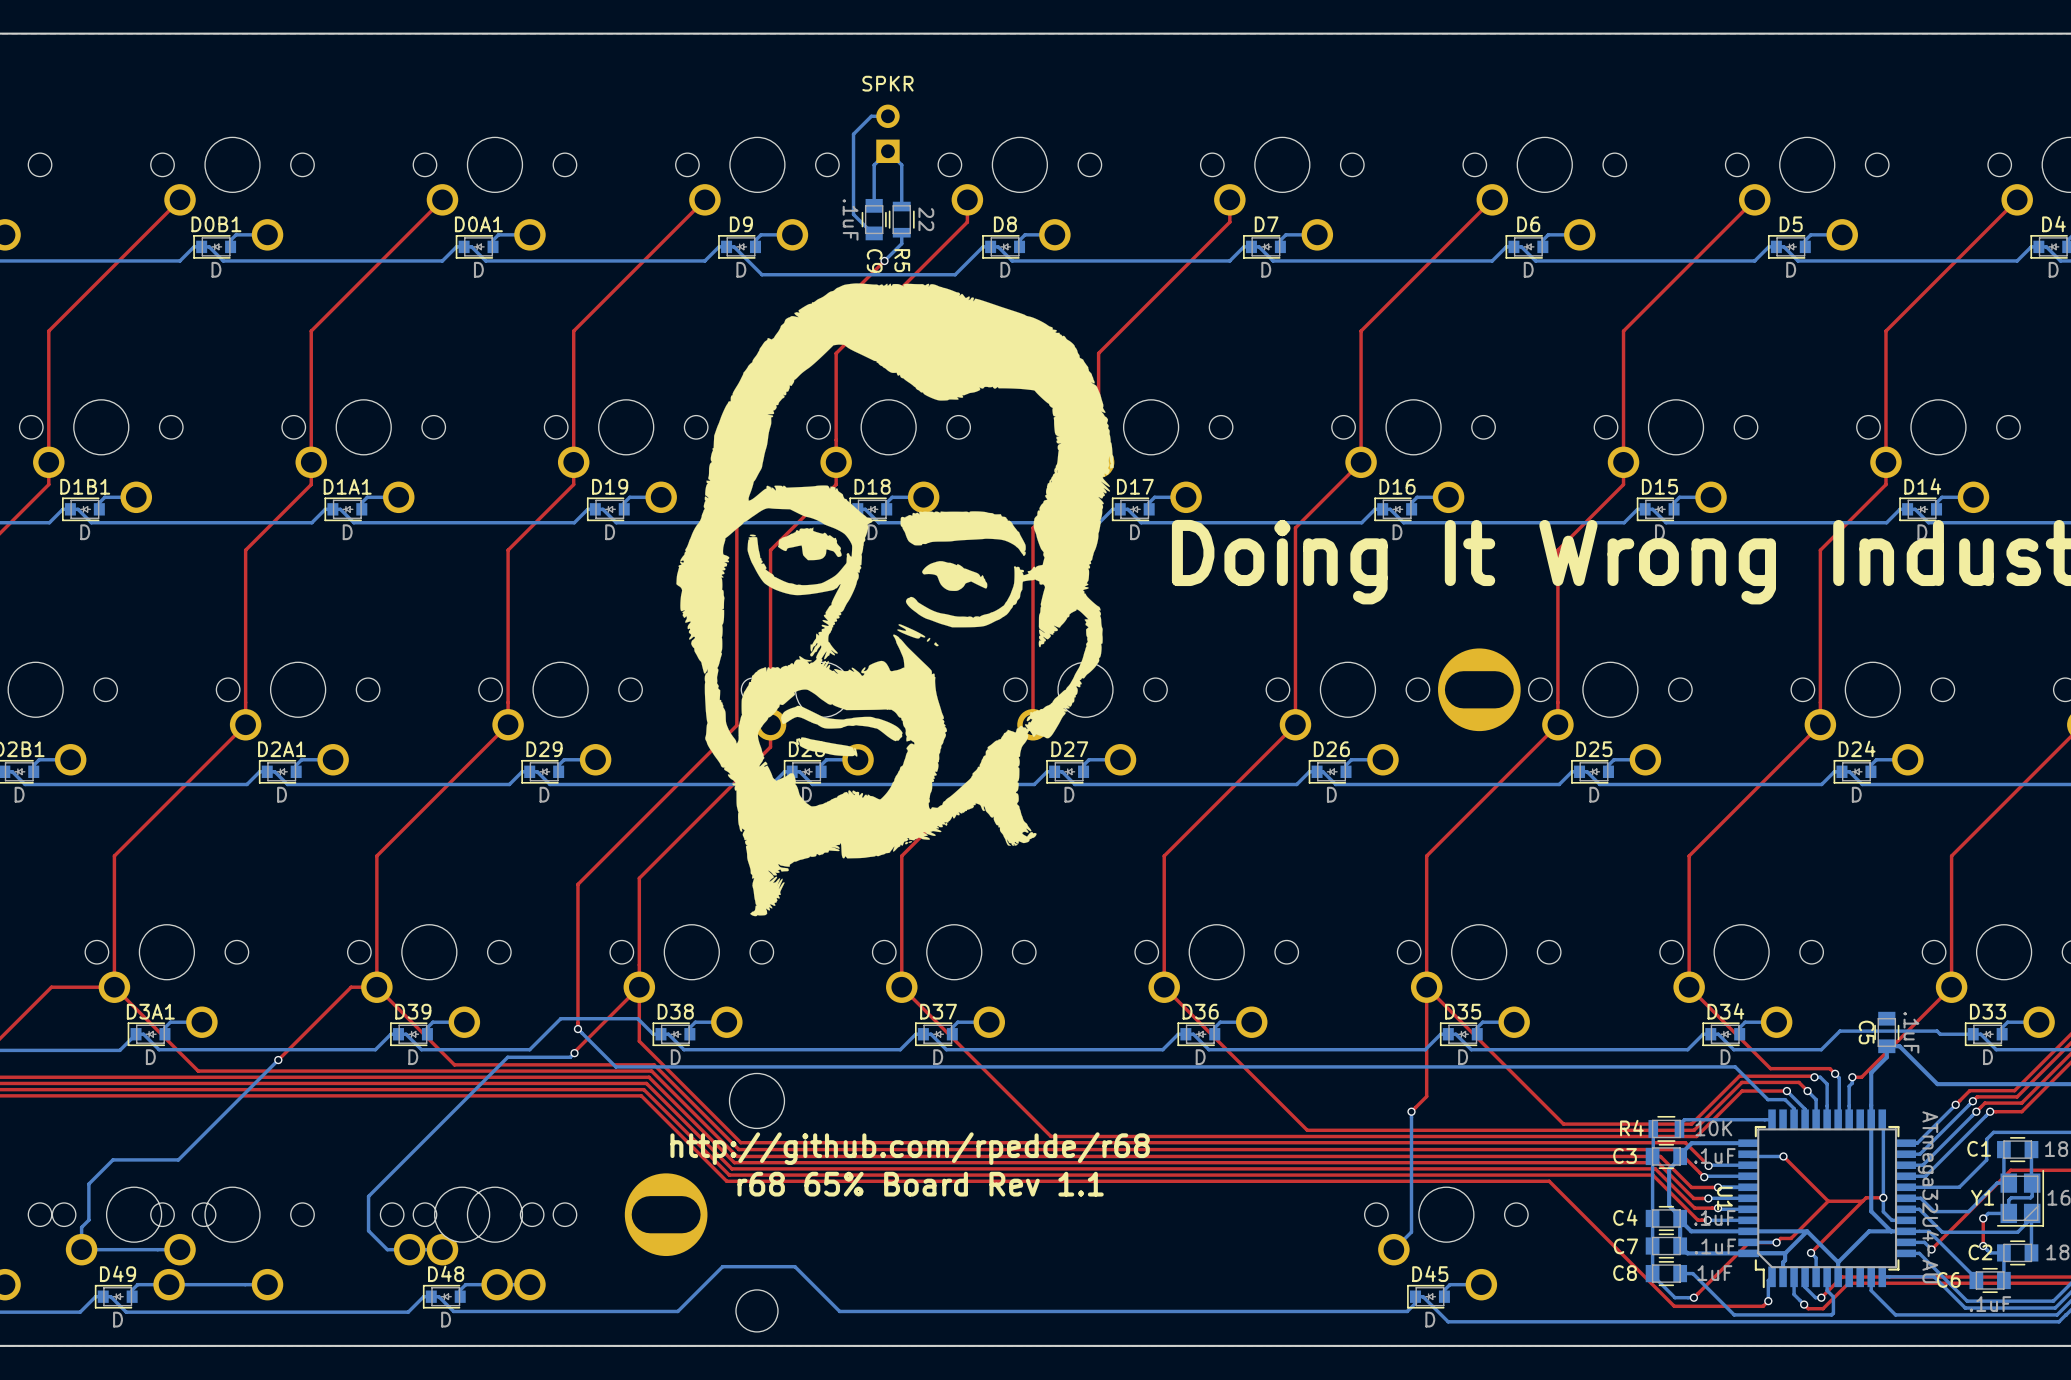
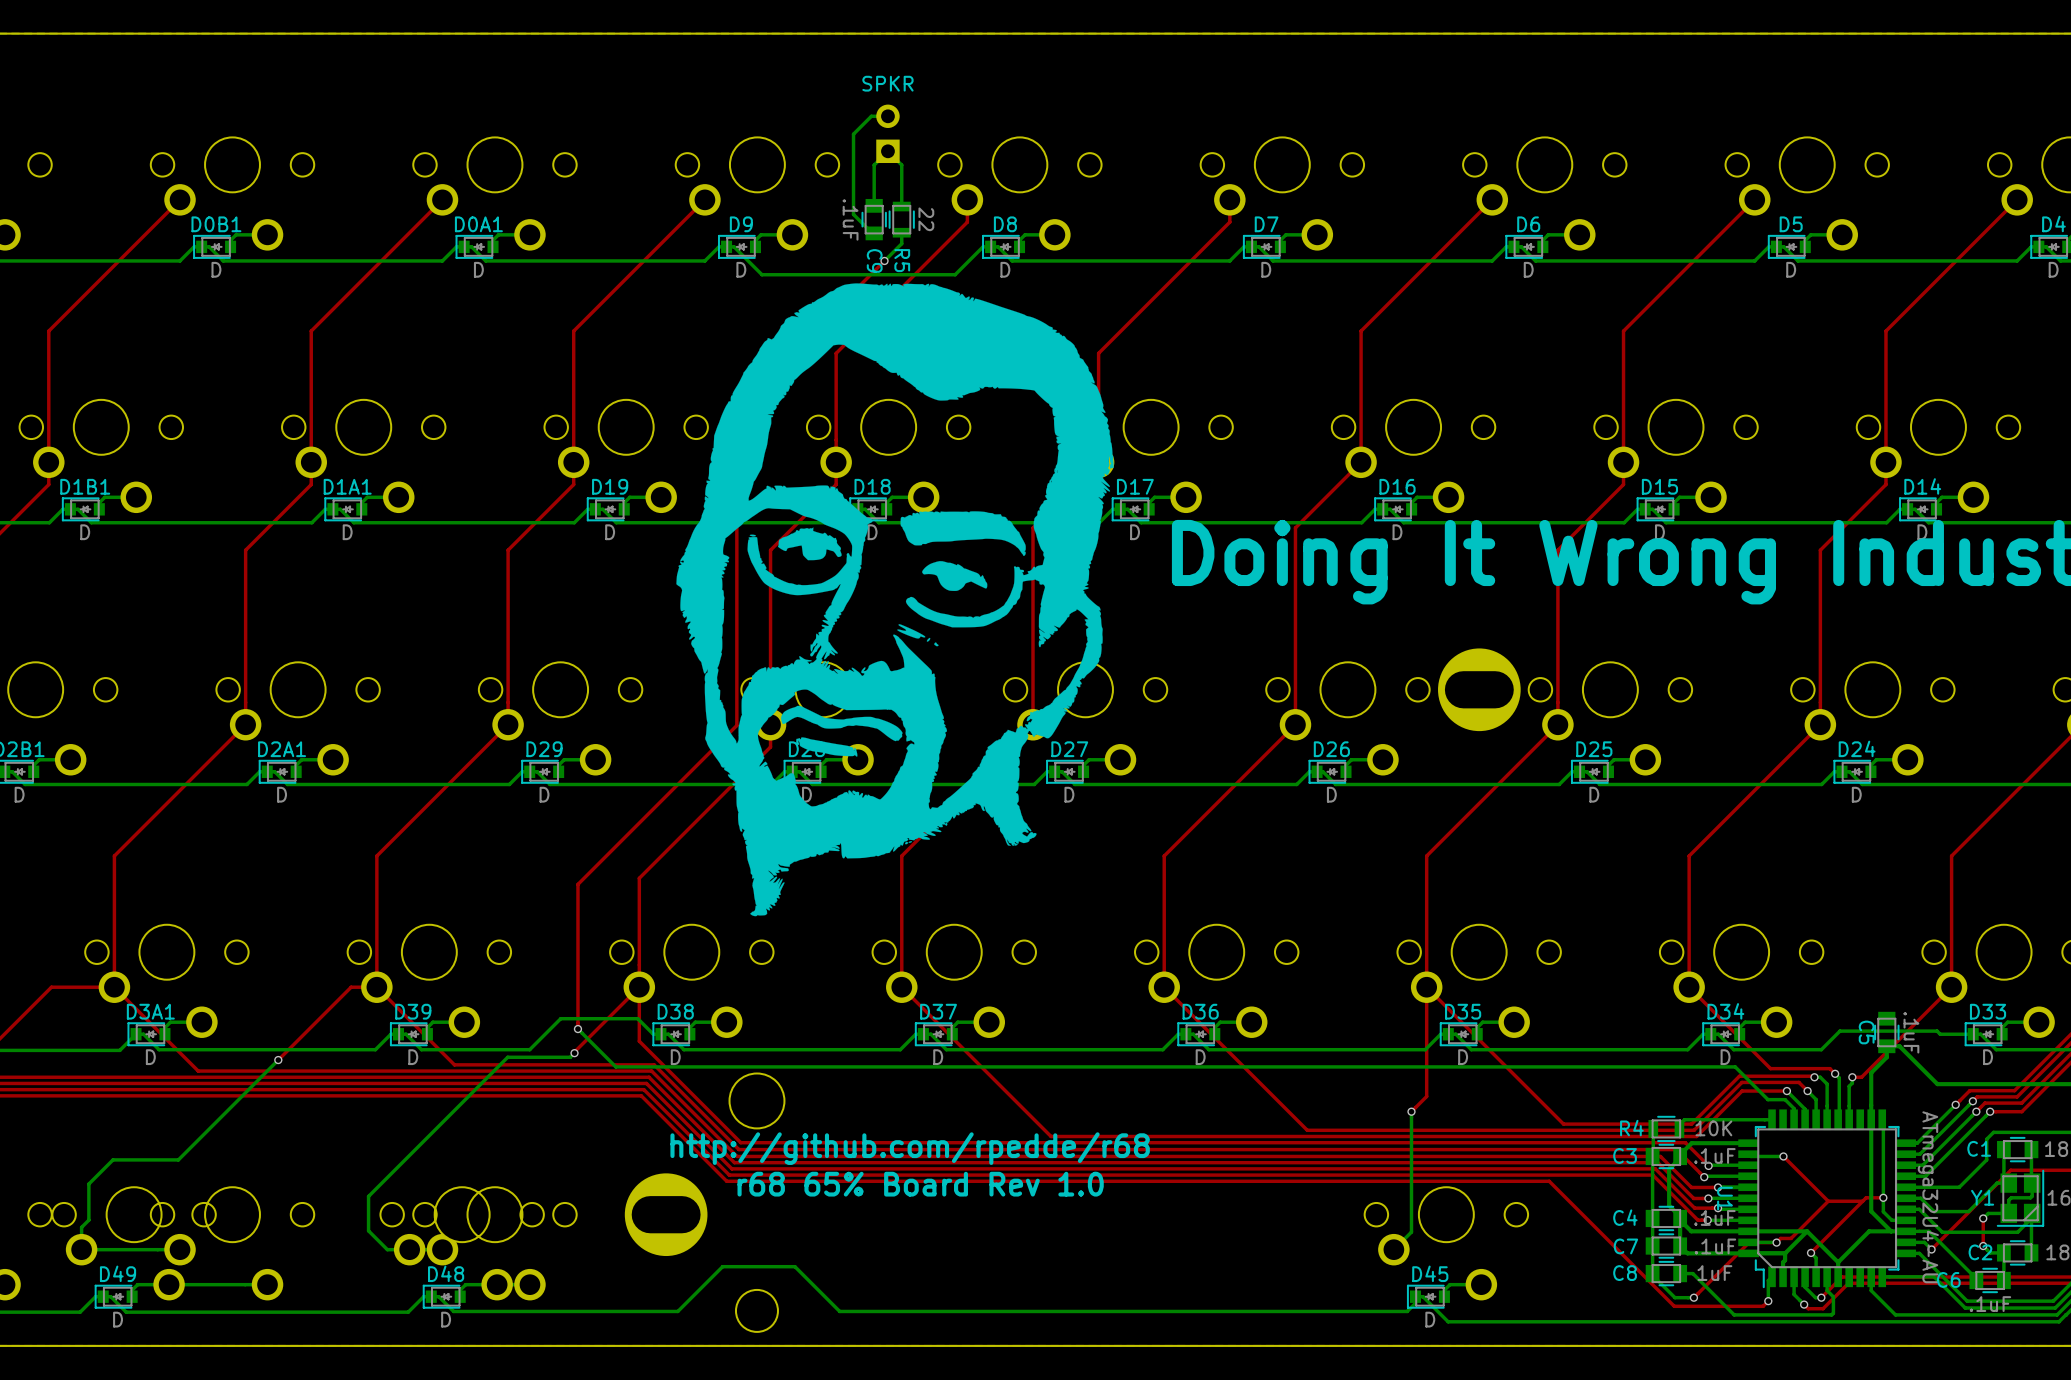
text: r68 65% Board Rev 1.1 (920, 1184) -> r68 65% Board Rev 1.0 (920, 1184)

